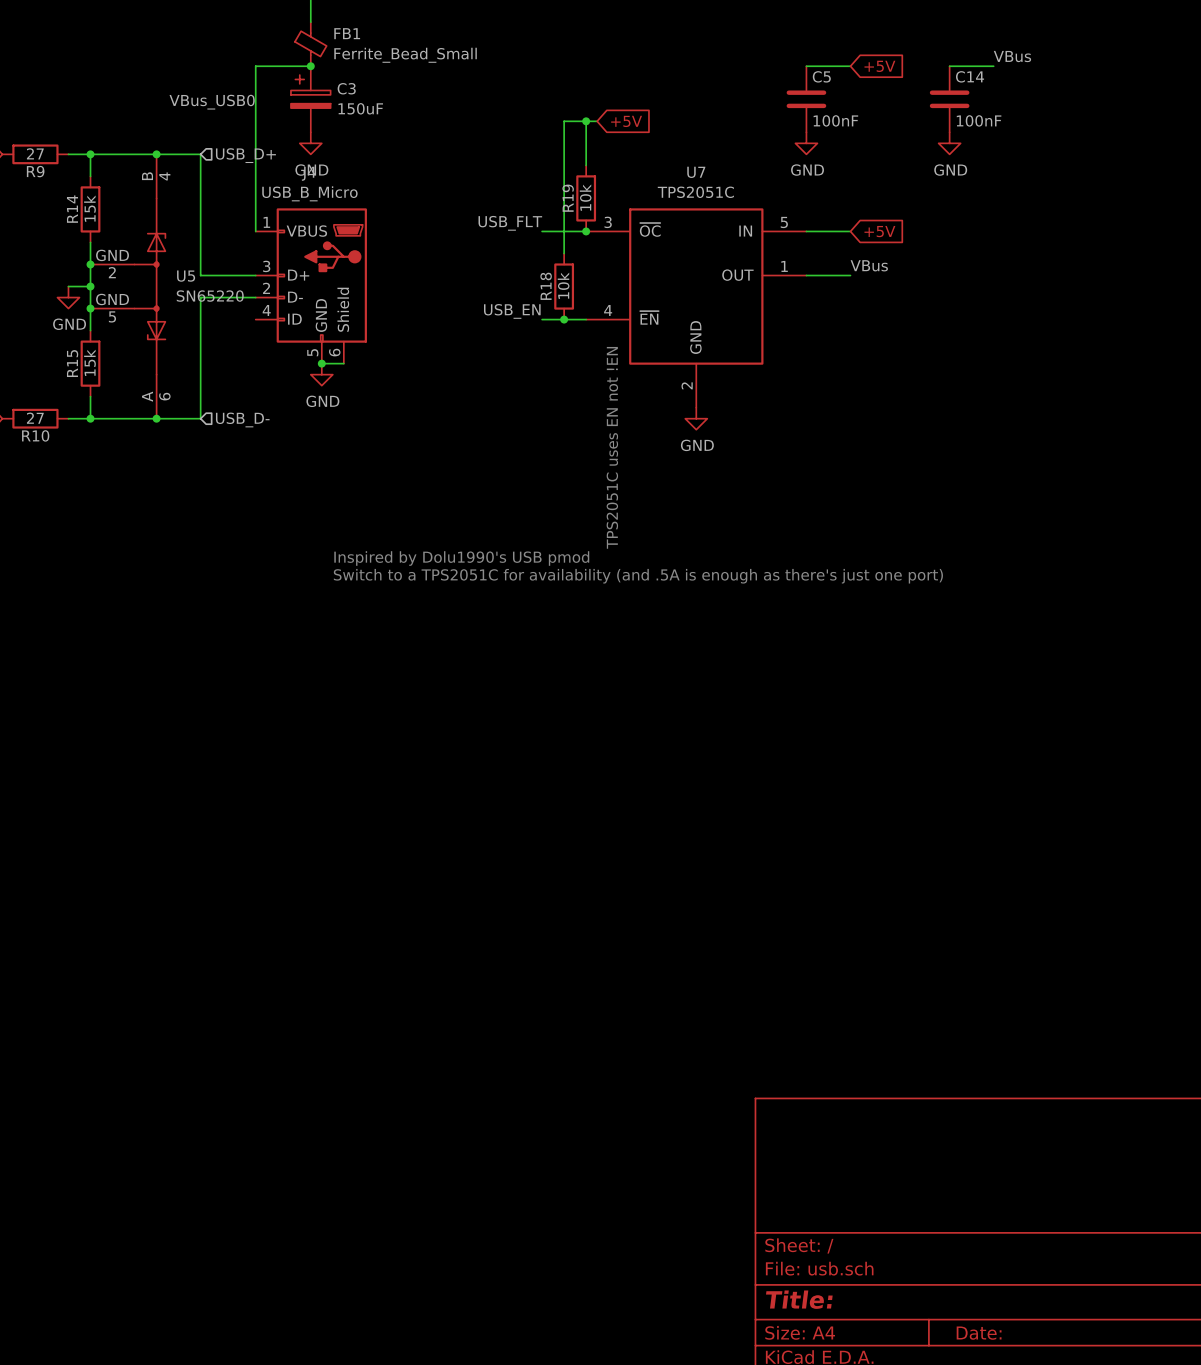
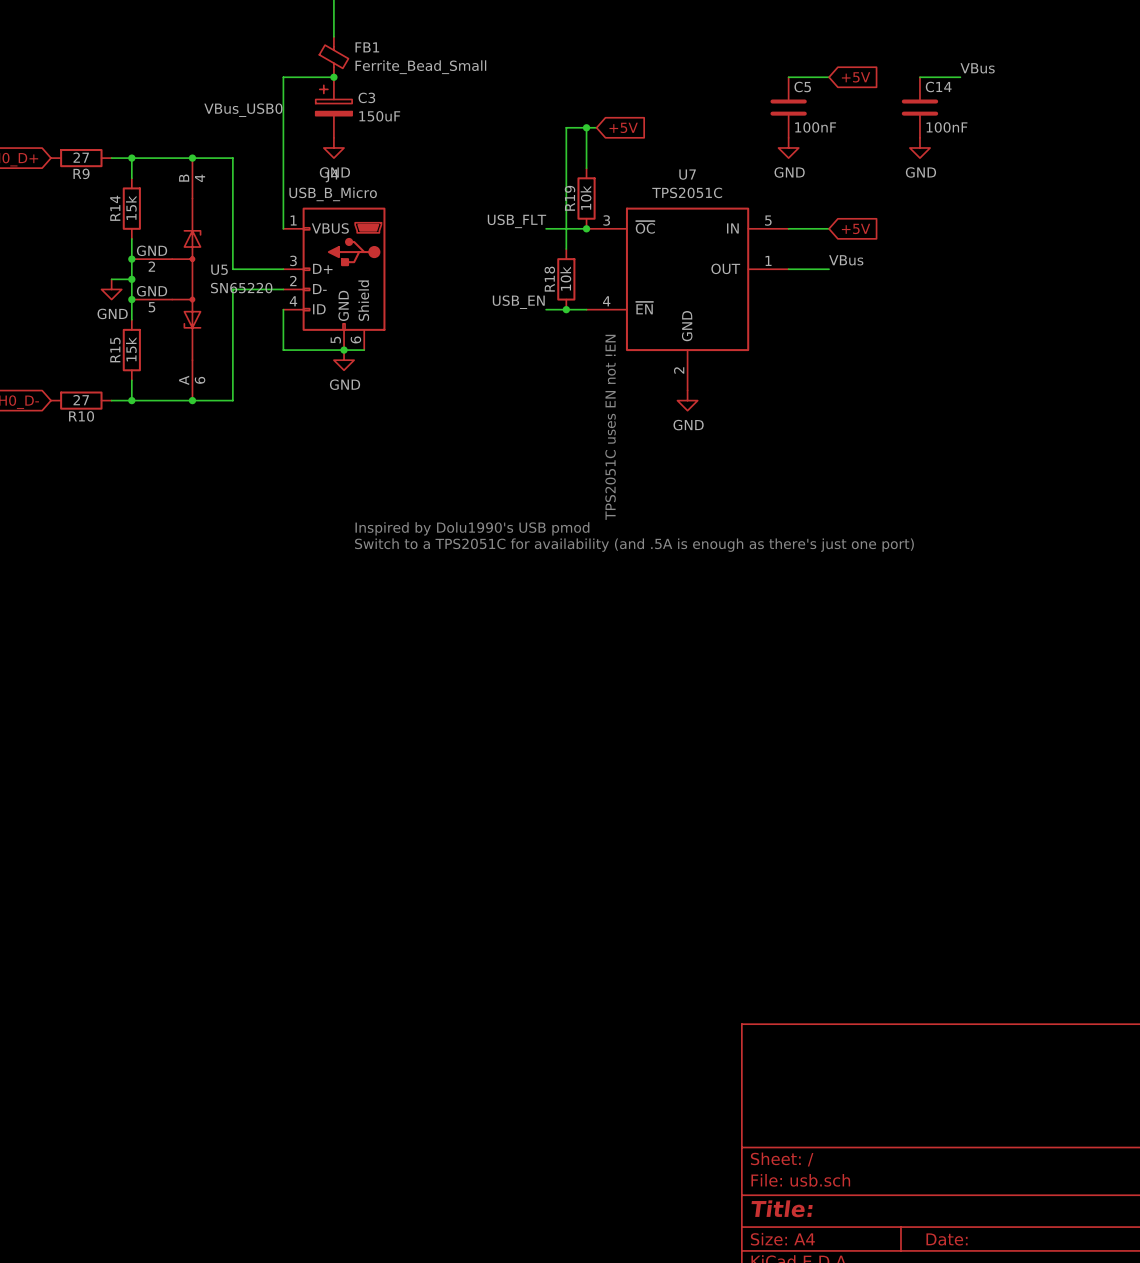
hierarchical label: USB_D+ (245, 155) -> none
wire: none -> (283, 309) (283, 350) (344, 350)
hierarchical label: USB_D- (242, 419) -> none

